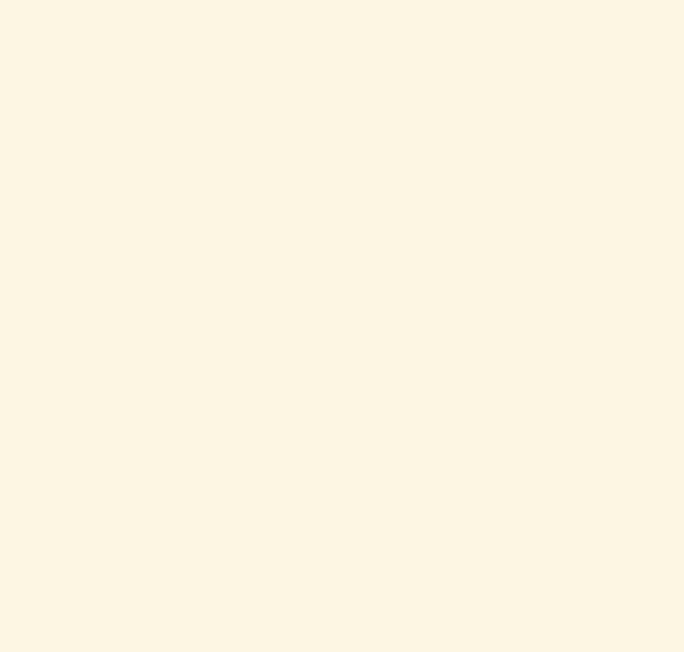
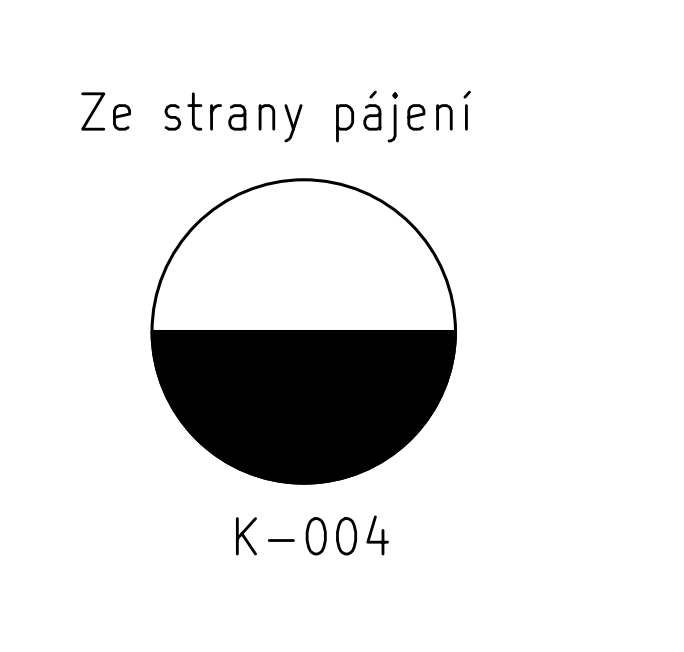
text: none -> Ze strany pájení (276, 116)
drawing: none -> [150, 178, 457, 485]
text: none -> K-004 (312, 535)

